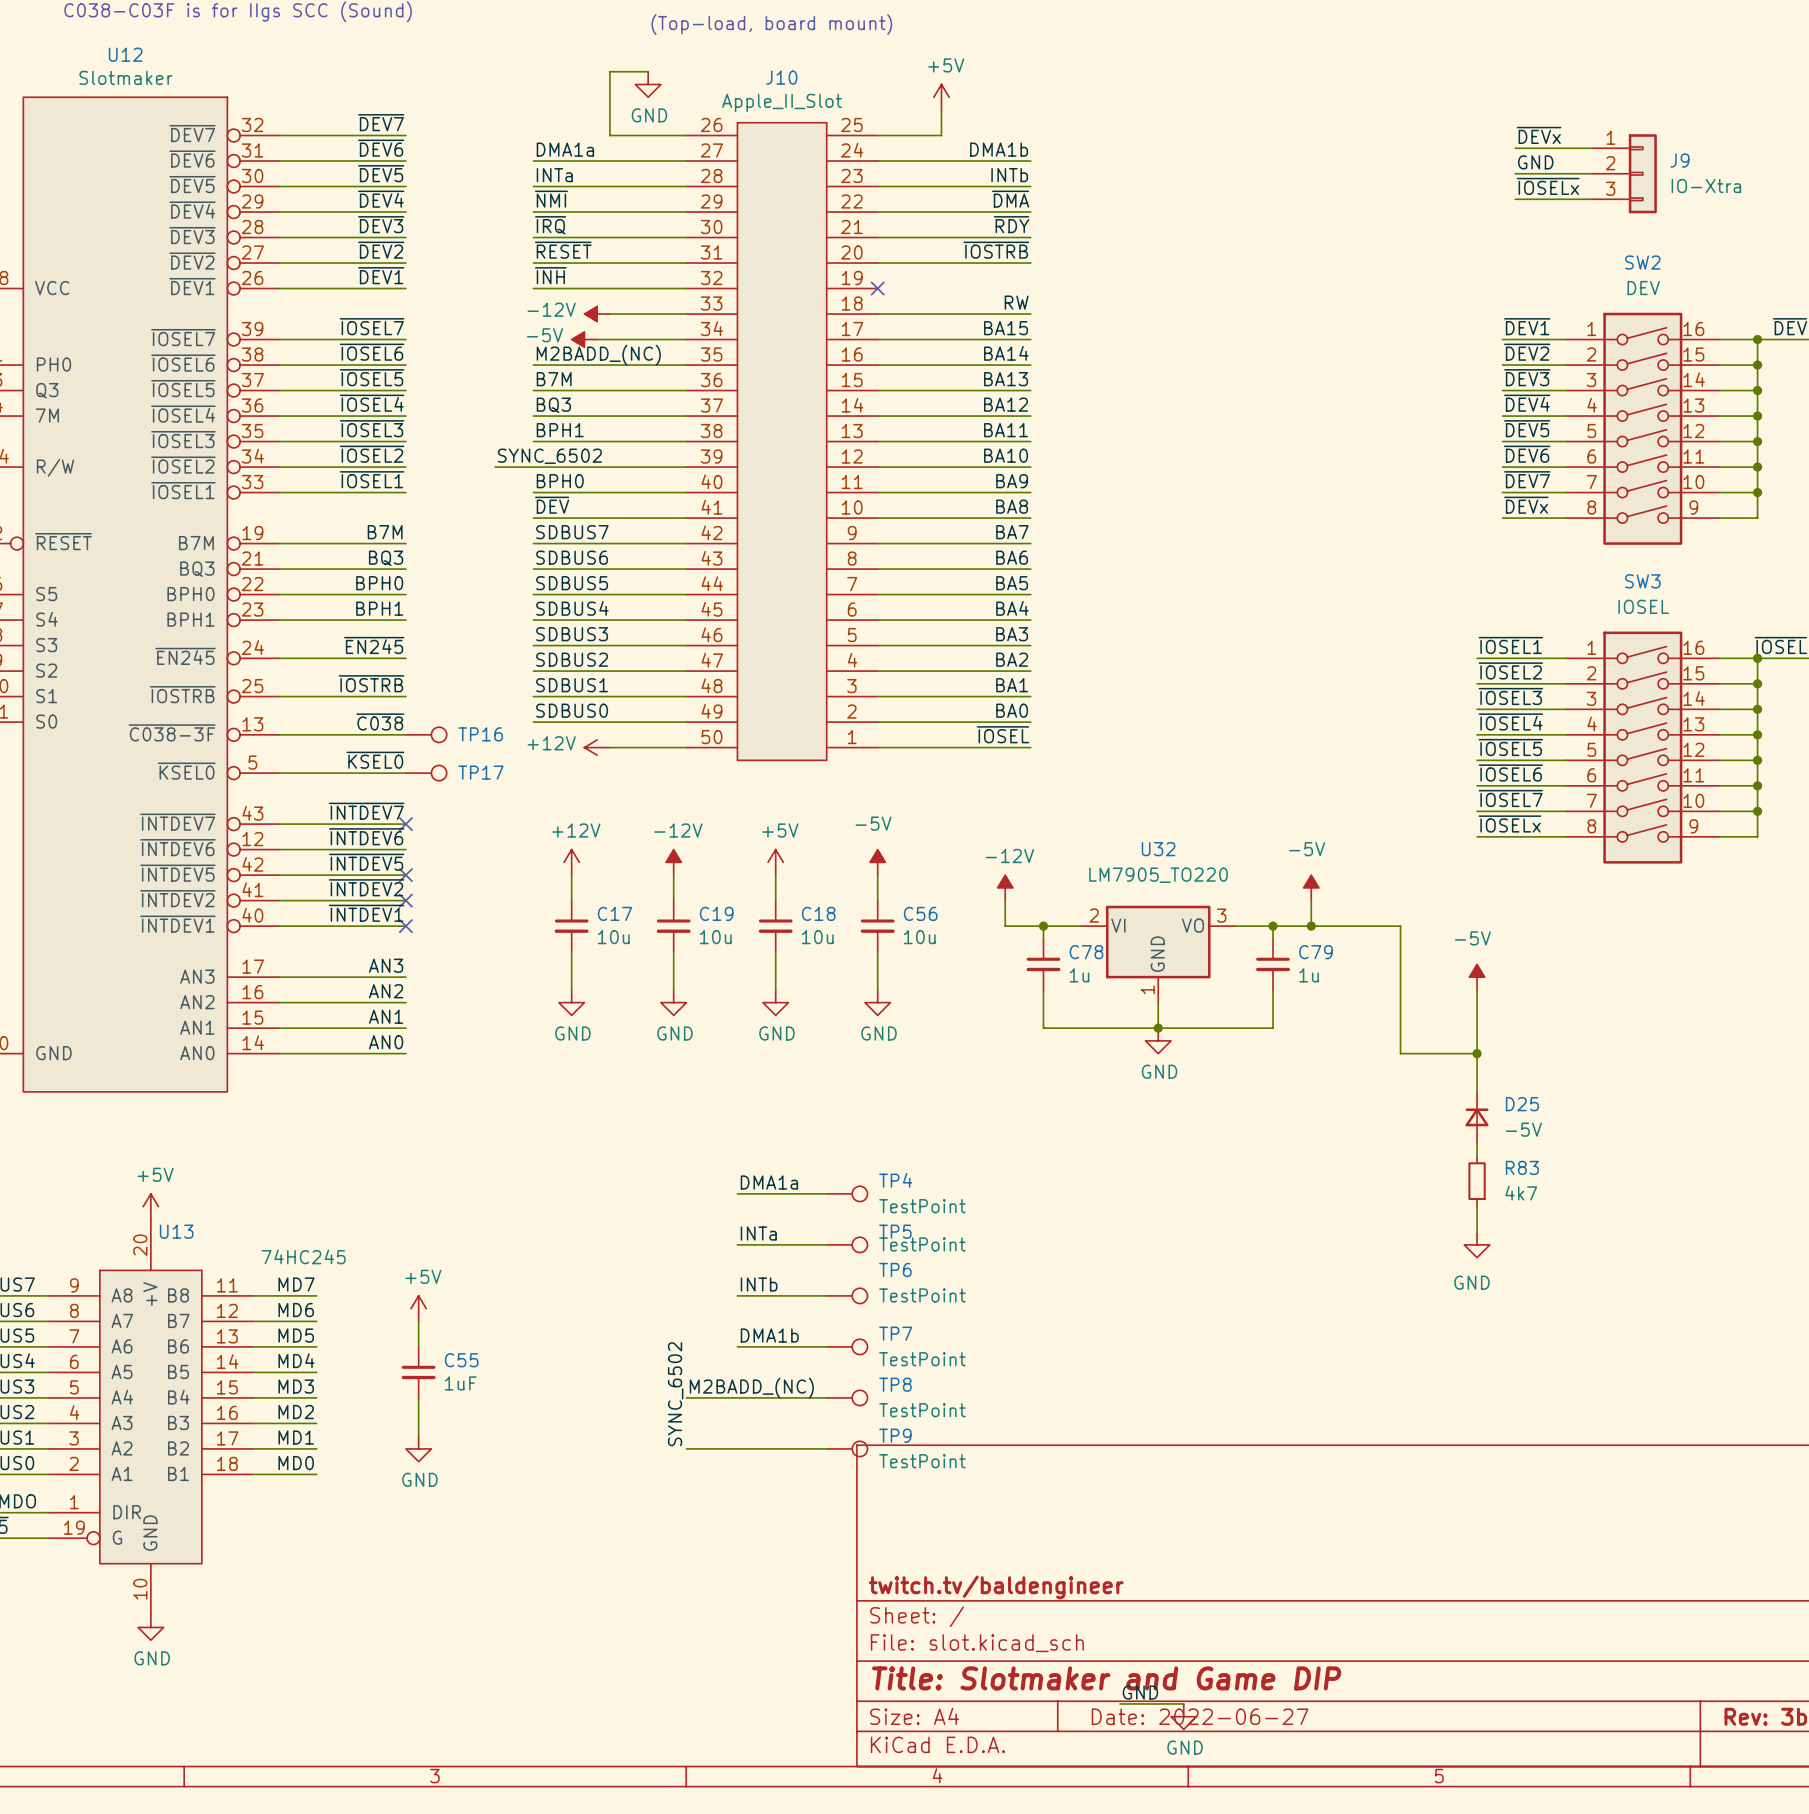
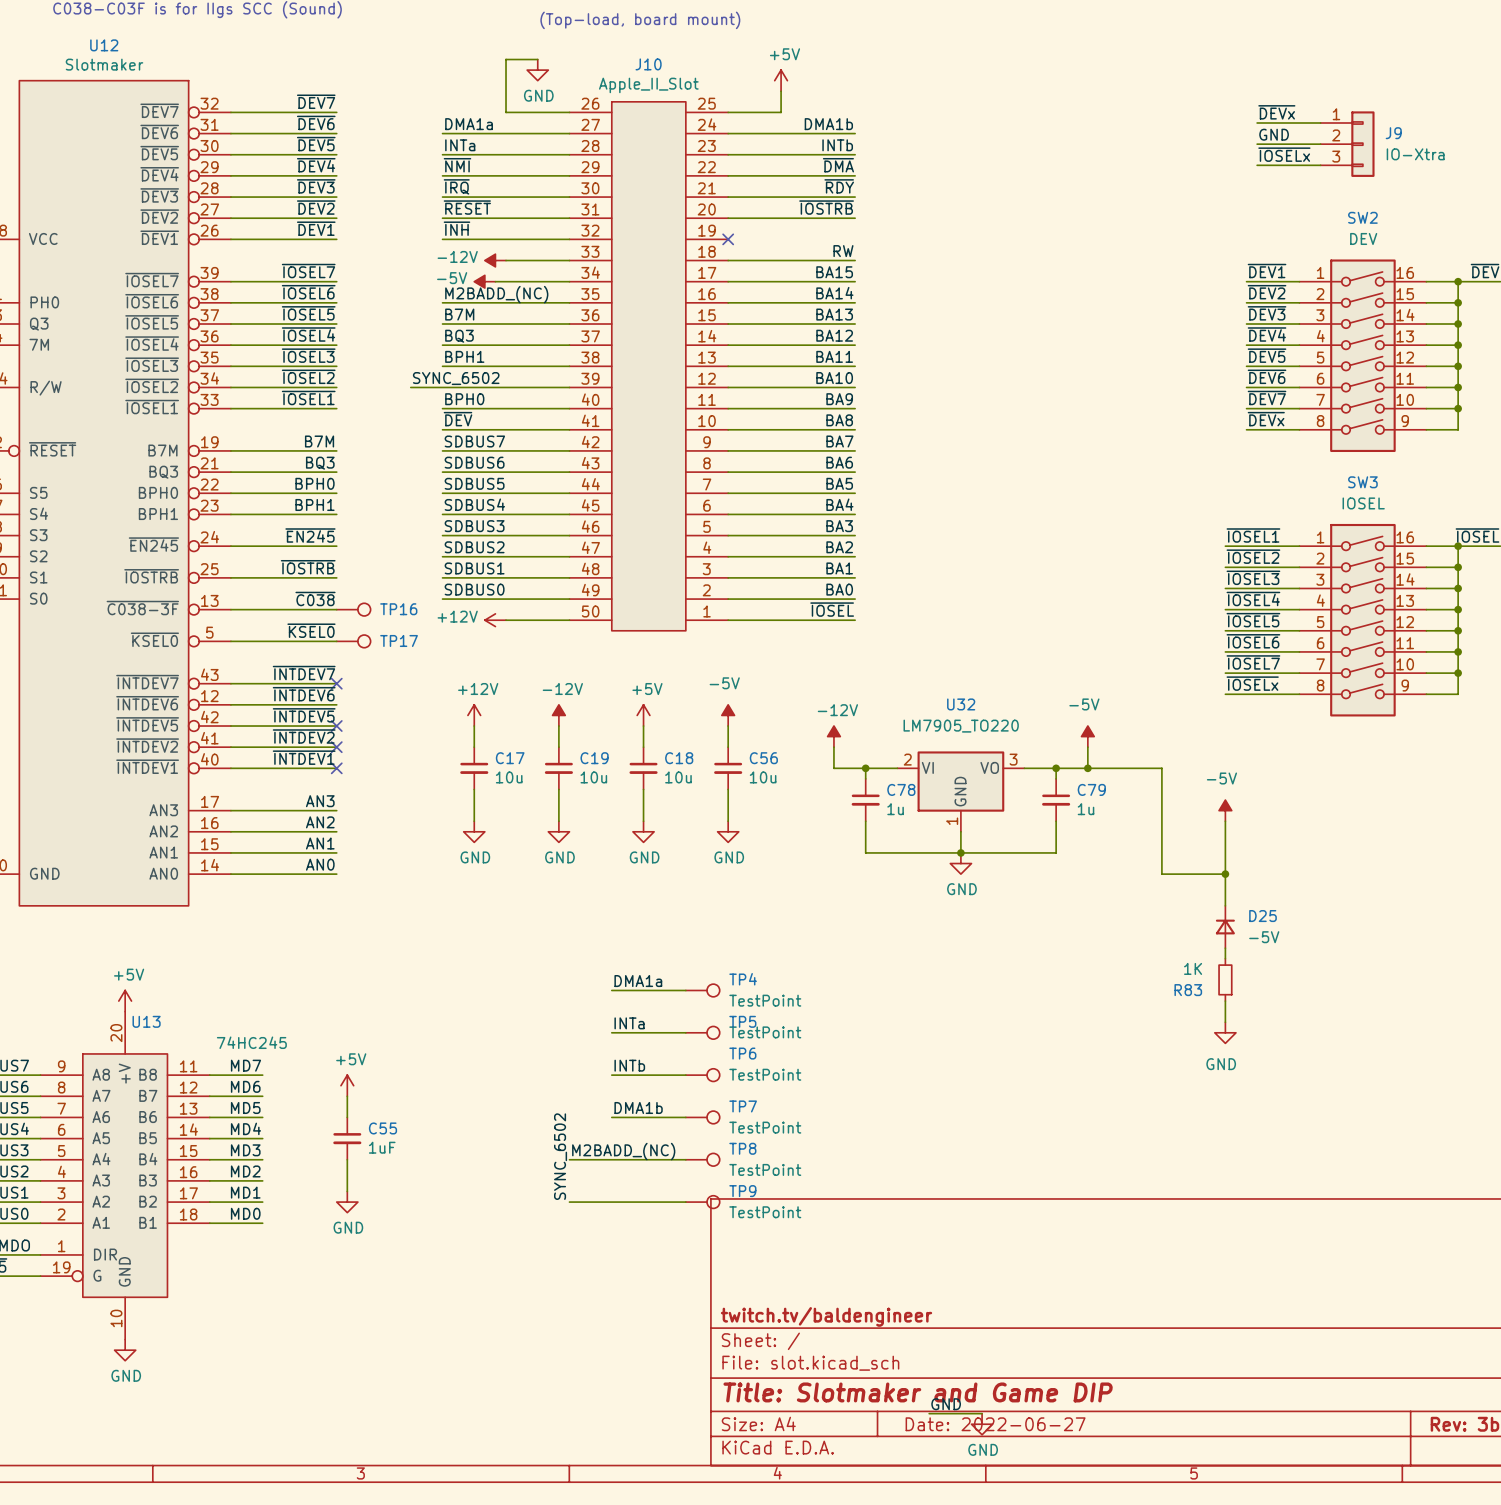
R83 name position: R83 (1522, 1167) -> R83 (1188, 990)
R83 value: 4k7 (1521, 1193) -> 1K (1193, 968)

